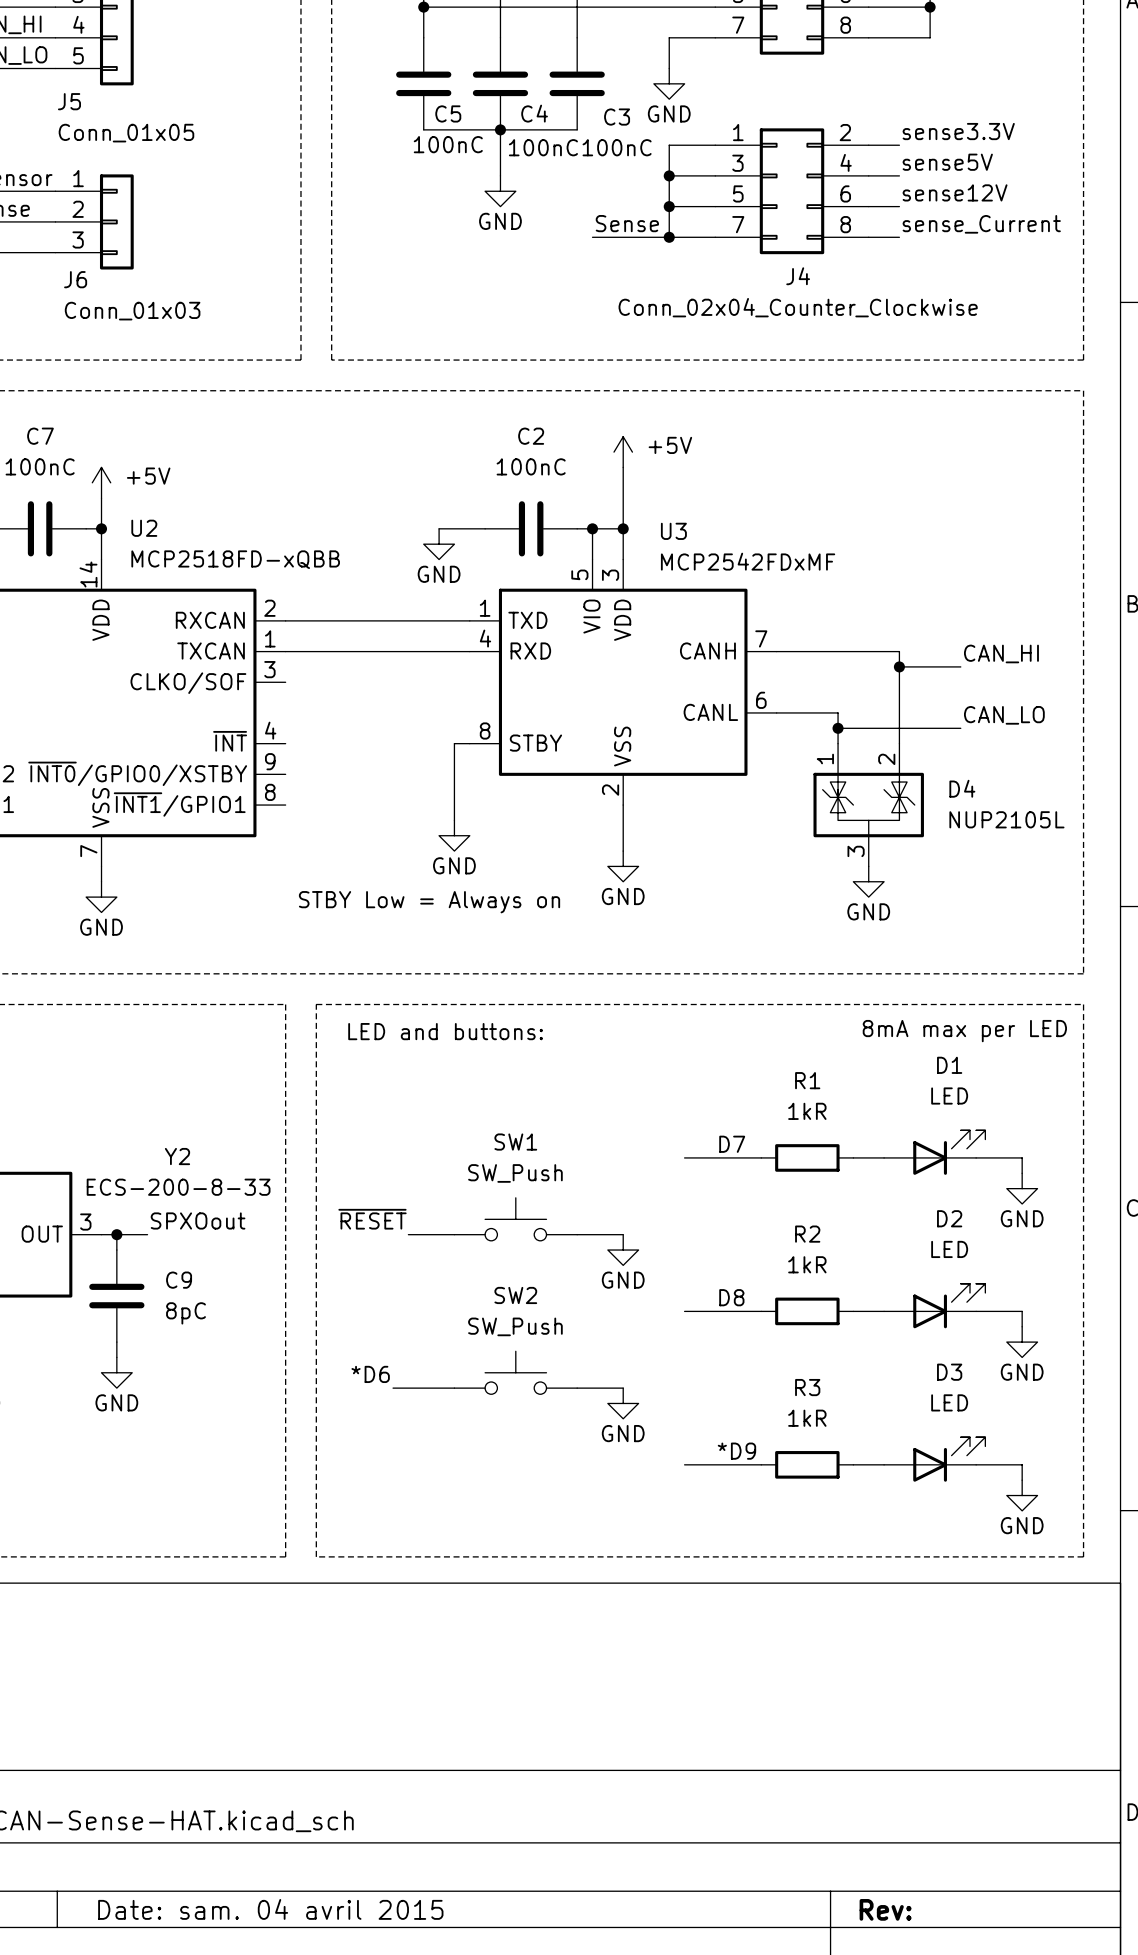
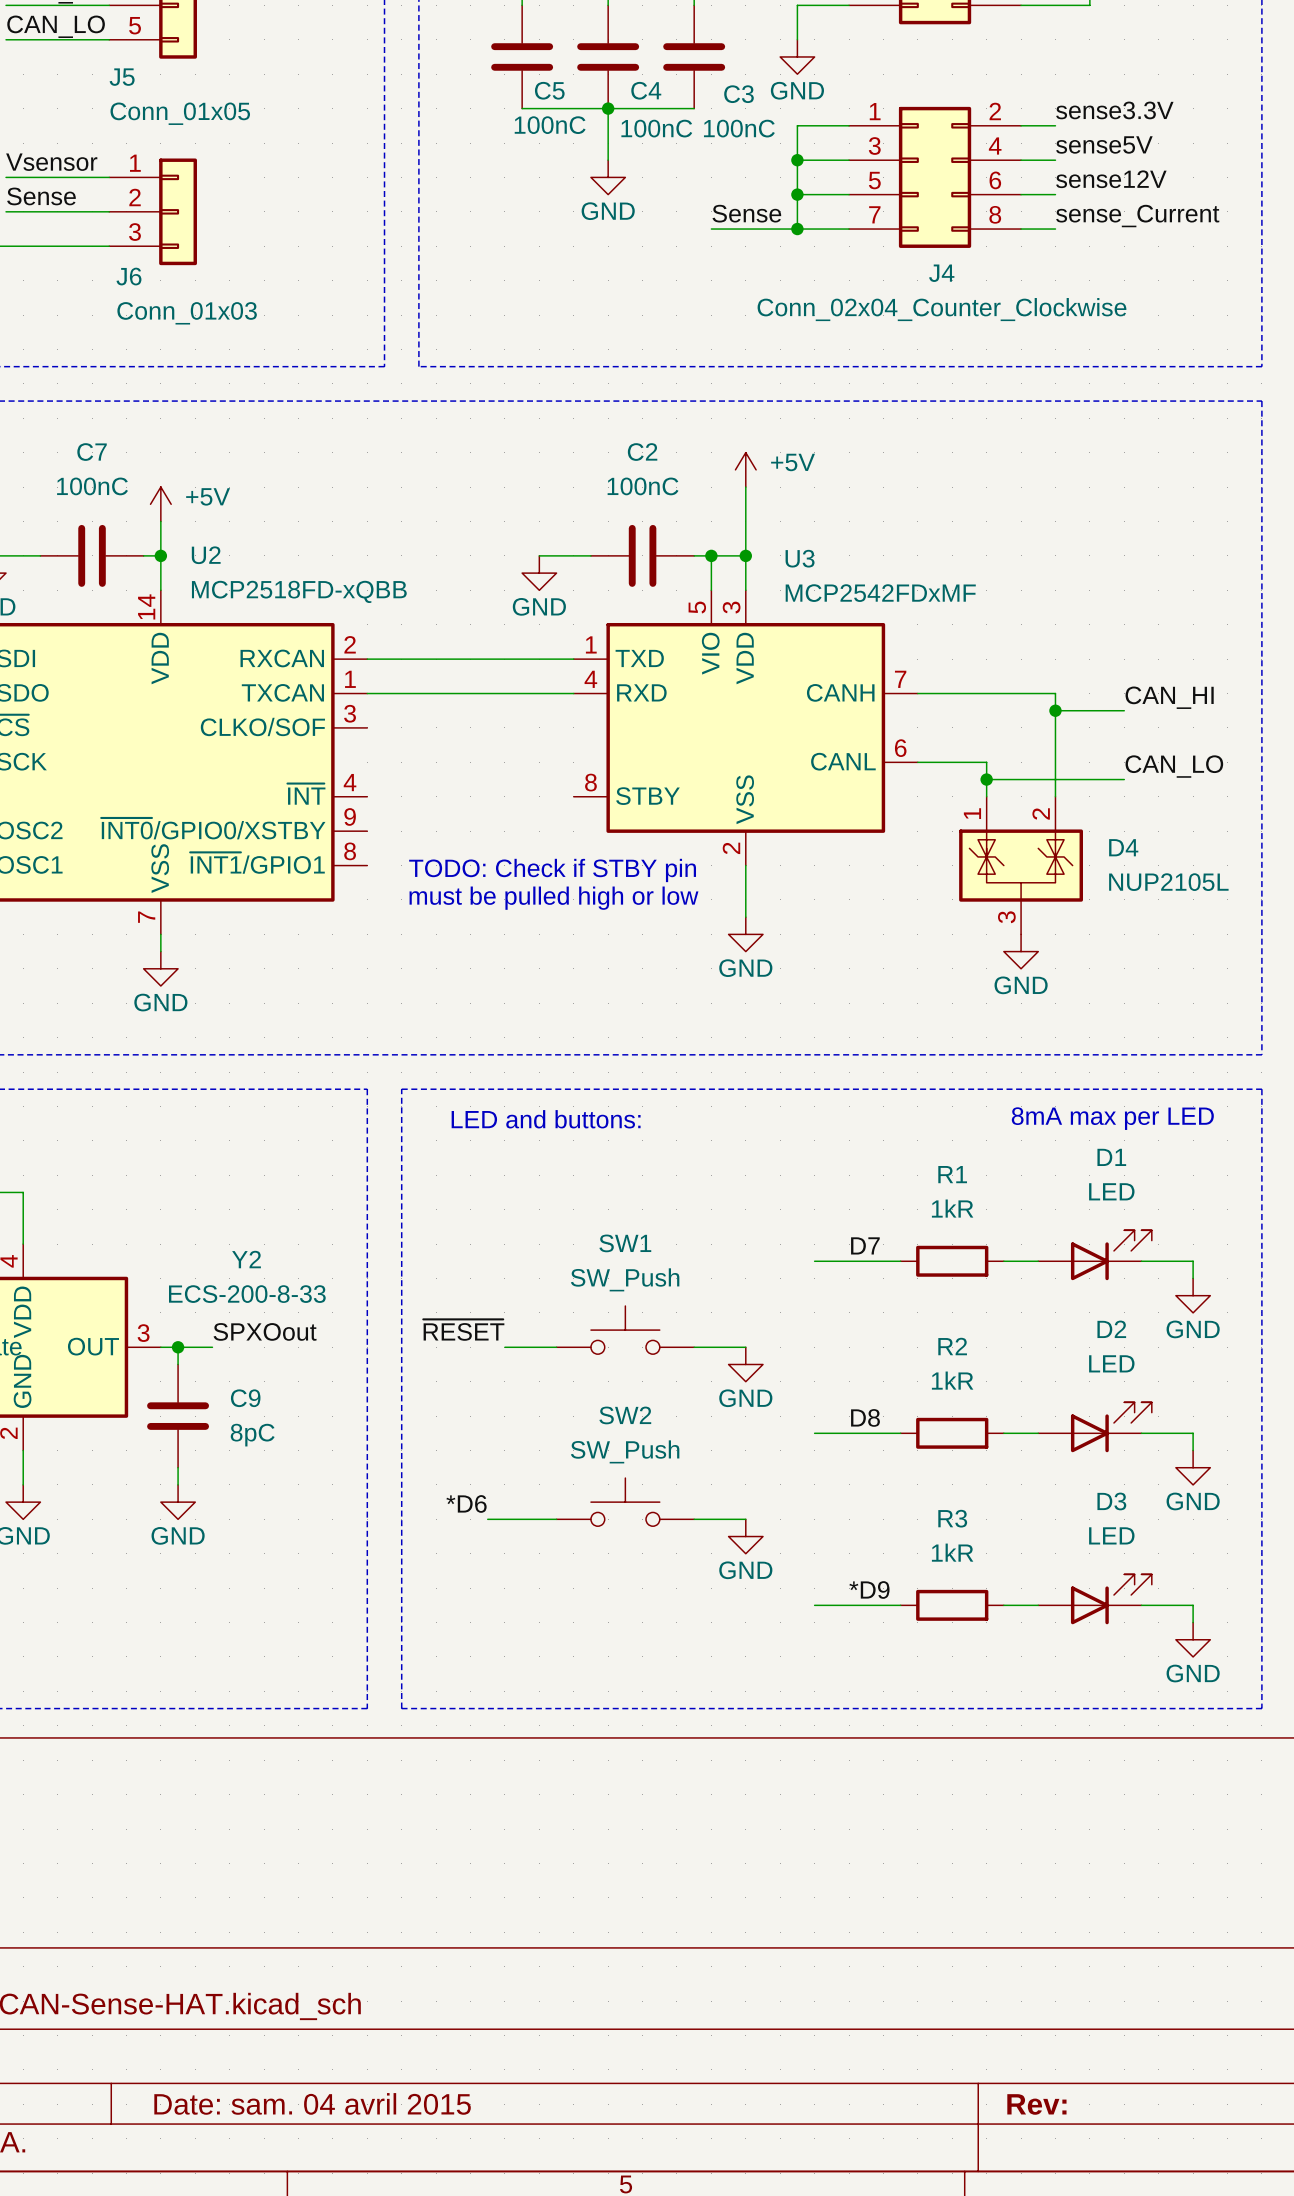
wire: (469, 743) (454, 743) (454, 820) -> none
text: none -> TODO: Check if STBY pin (552, 870)
text: none -> must be pulled high or low (553, 898)
power symbol: GND (454, 835) -> none
text: STBY Low = Always on (429, 902) -> none

